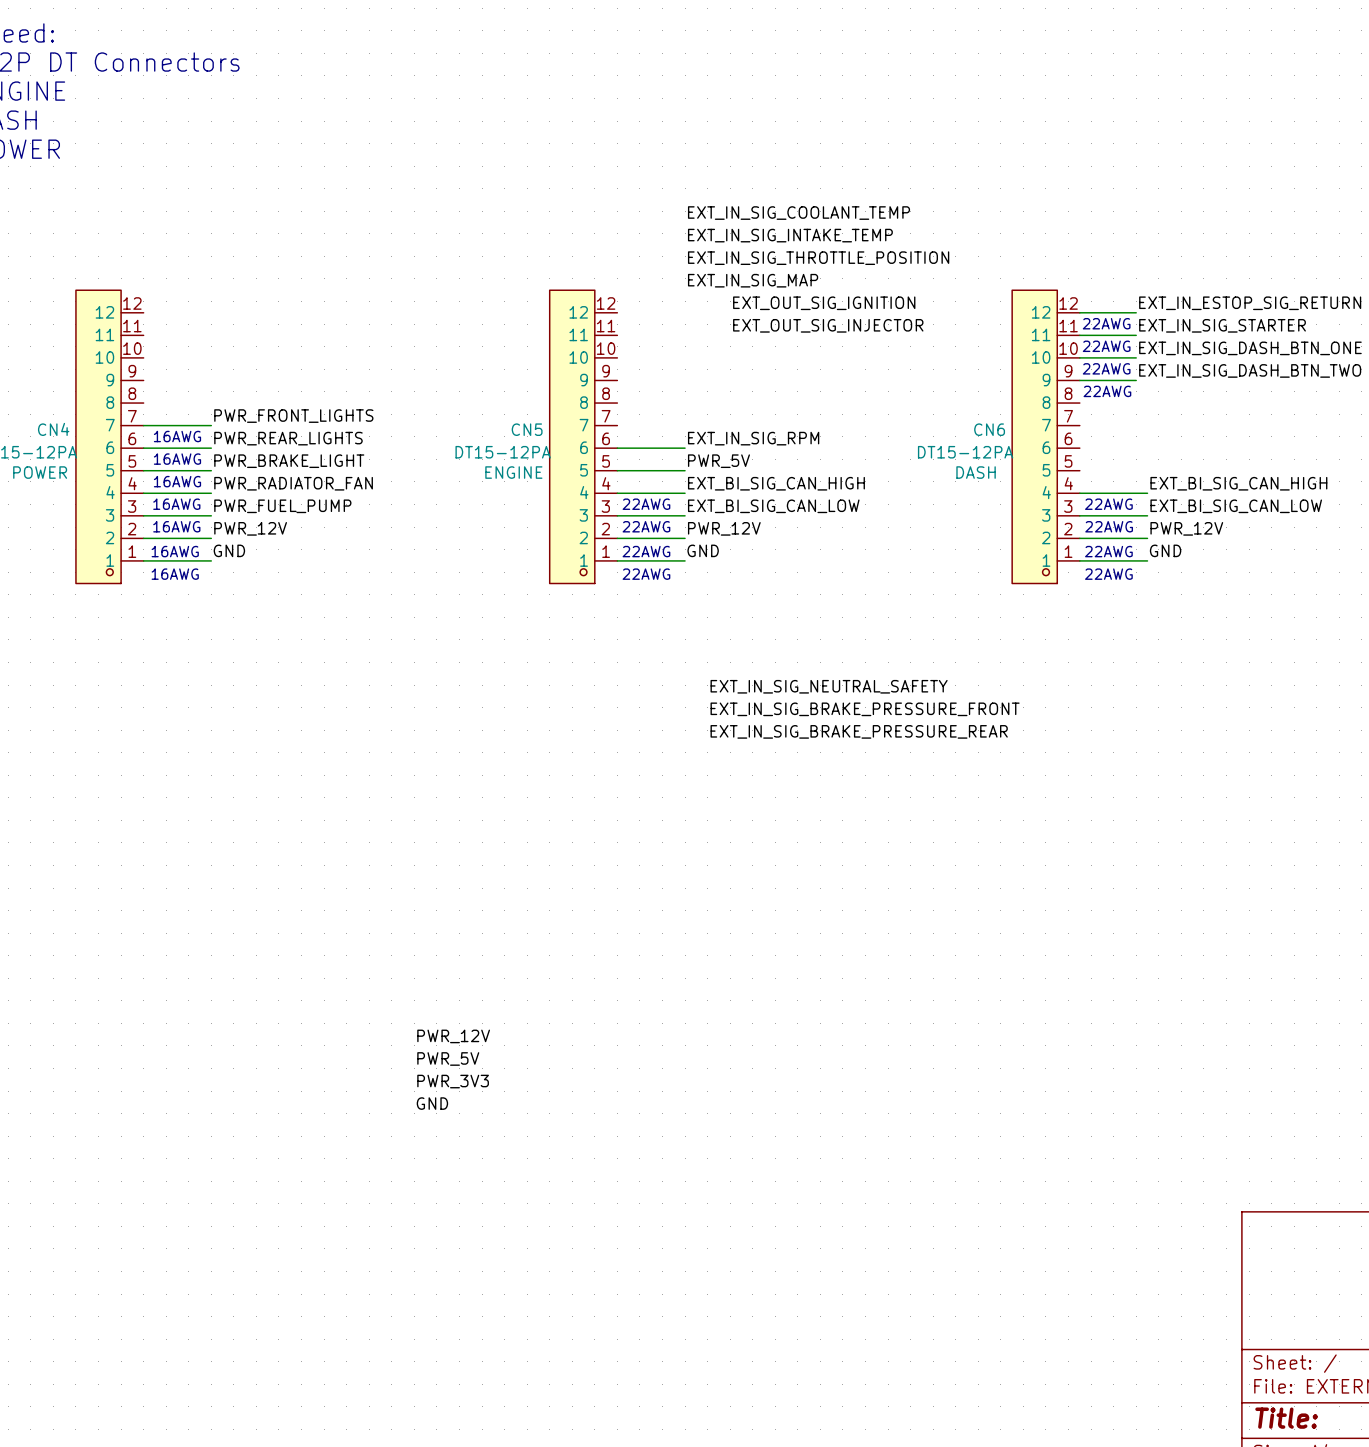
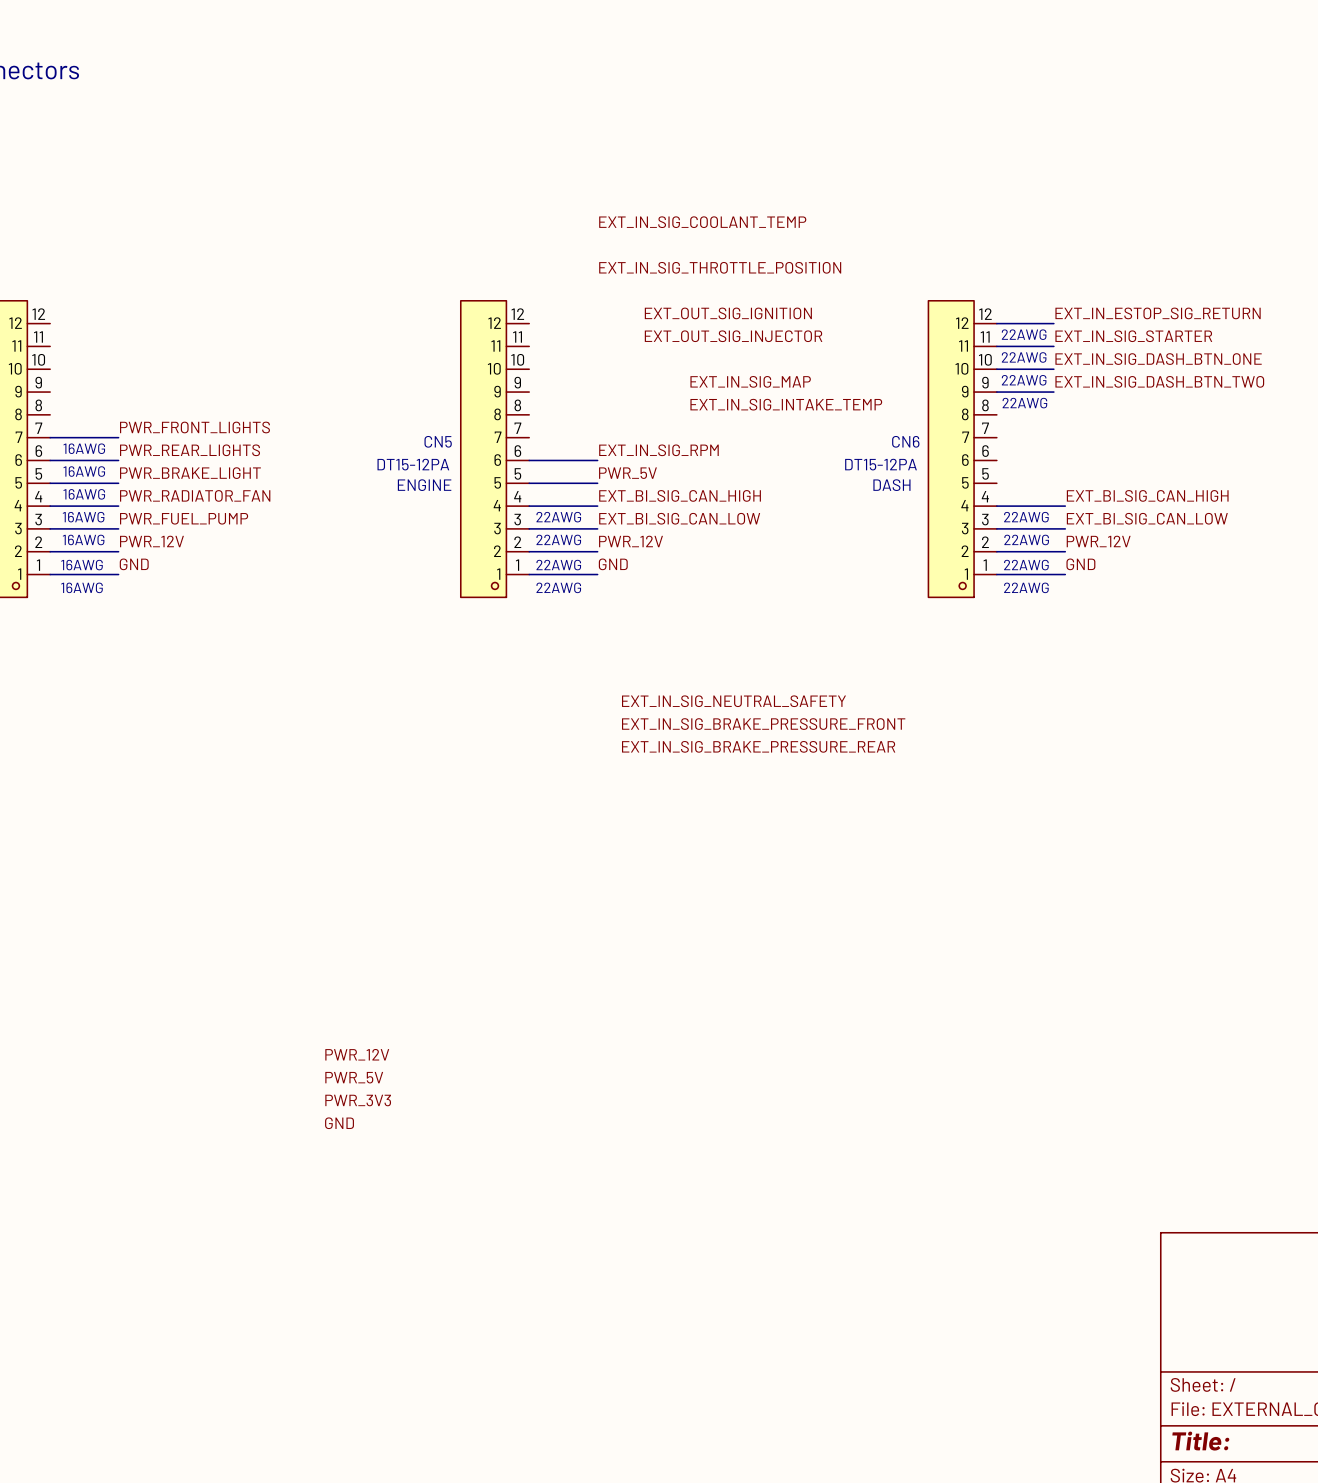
label position: EXT_IN_SIG_INTAKE_TEMP (790, 235) -> EXT_IN_SIG_INTAKE_TEMP (786, 404)
label position: EXT_IN_SIG_MAP (753, 280) -> EXT_IN_SIG_MAP (750, 381)

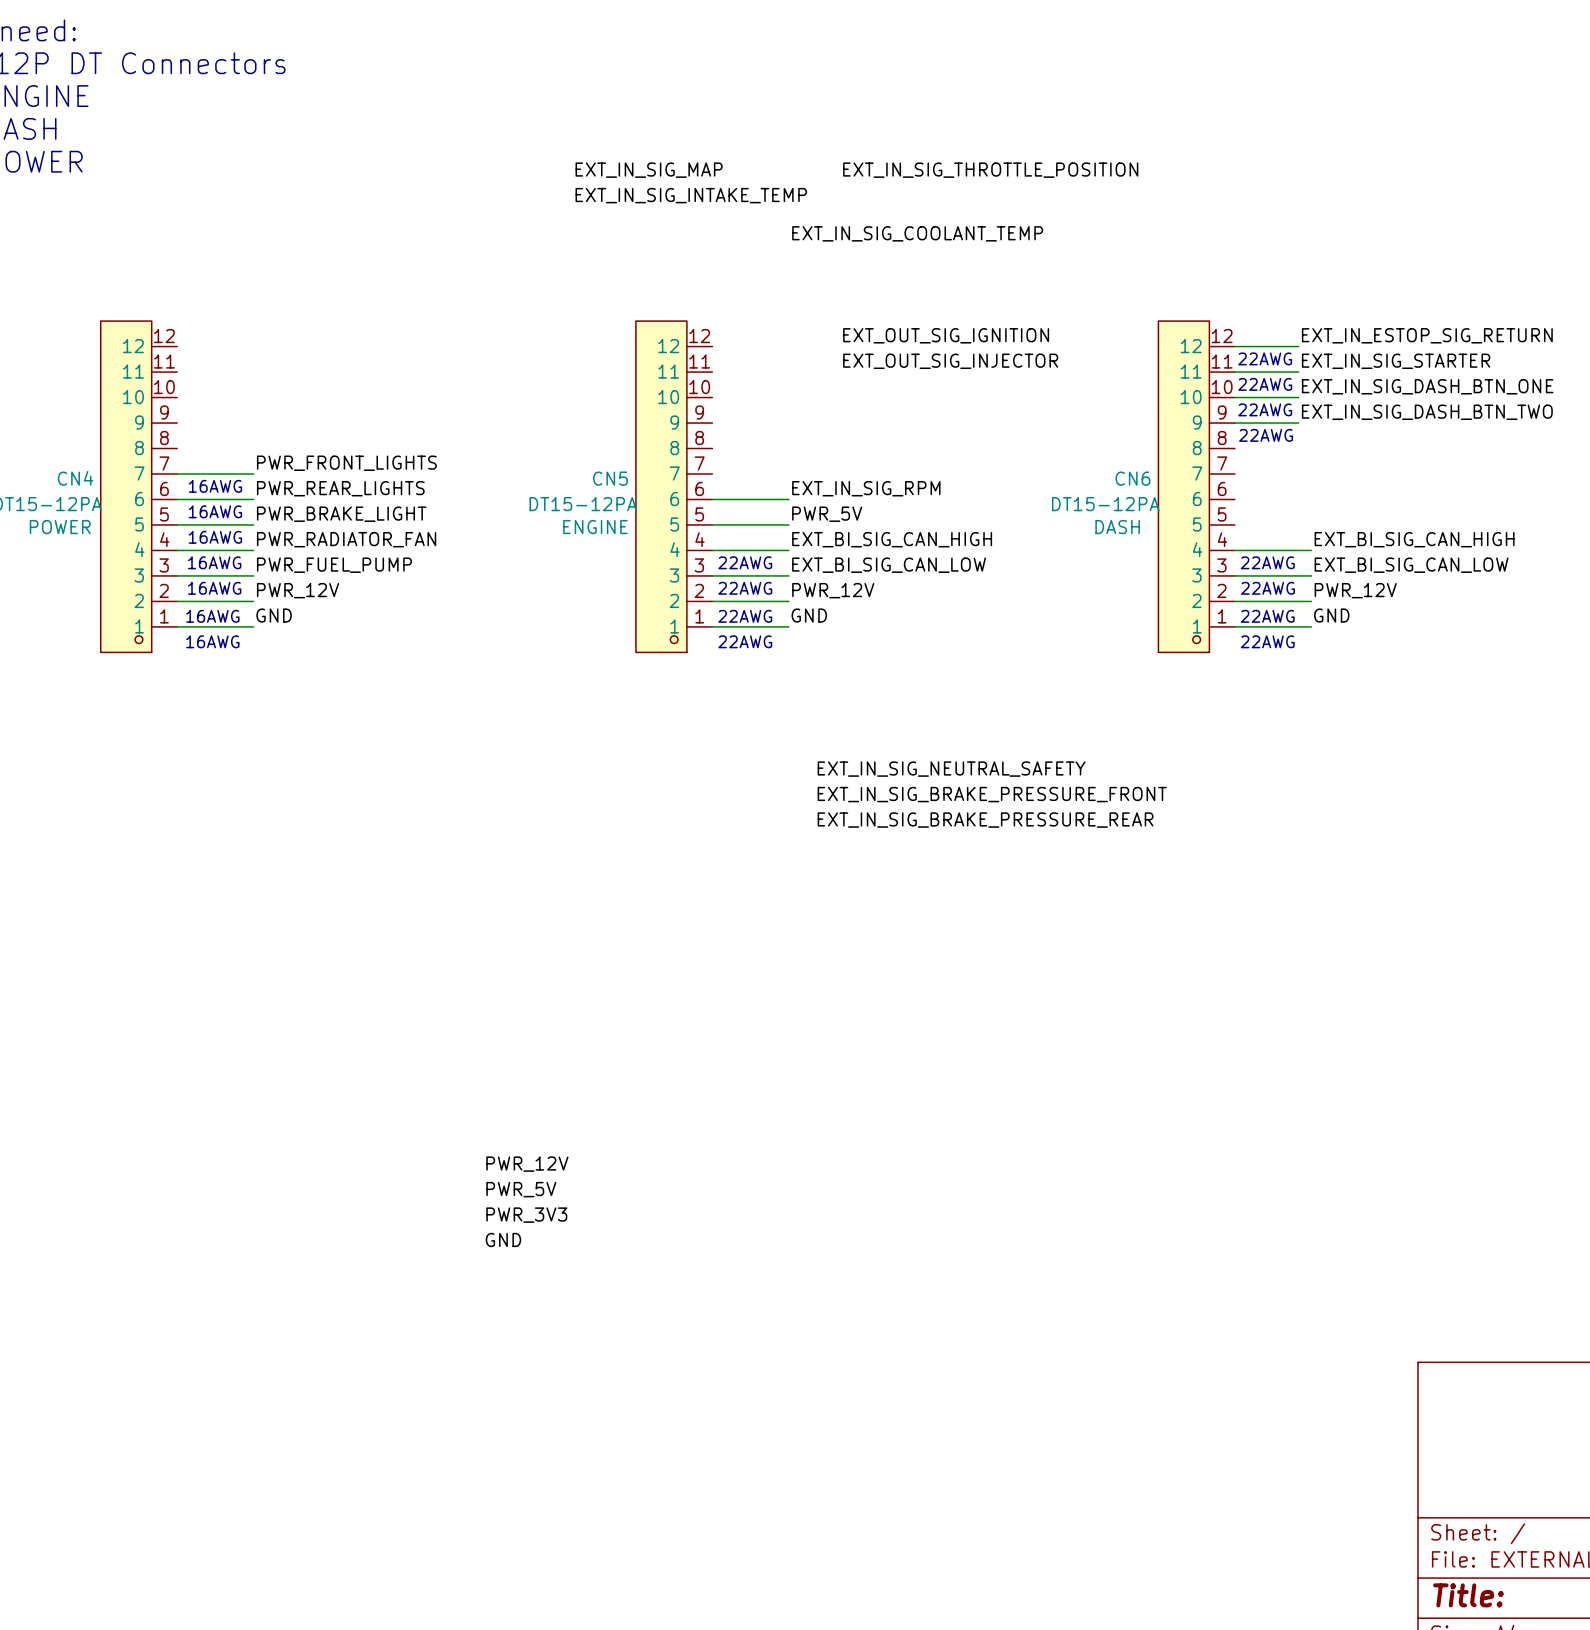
label: none -> EXT_IN_SIG_MAP (649, 170)
label: none -> EXT_IN_SIG_INTAKE_TEMP (691, 195)
label position: EXT_IN_SIG_THROTTLE_POSITION (720, 267) -> EXT_IN_SIG_THROTTLE_POSITION (990, 170)
label: EXT_IN_SIG_MAP (750, 381) -> none
label: EXT_IN_SIG_INTAKE_TEMP (786, 404) -> none

